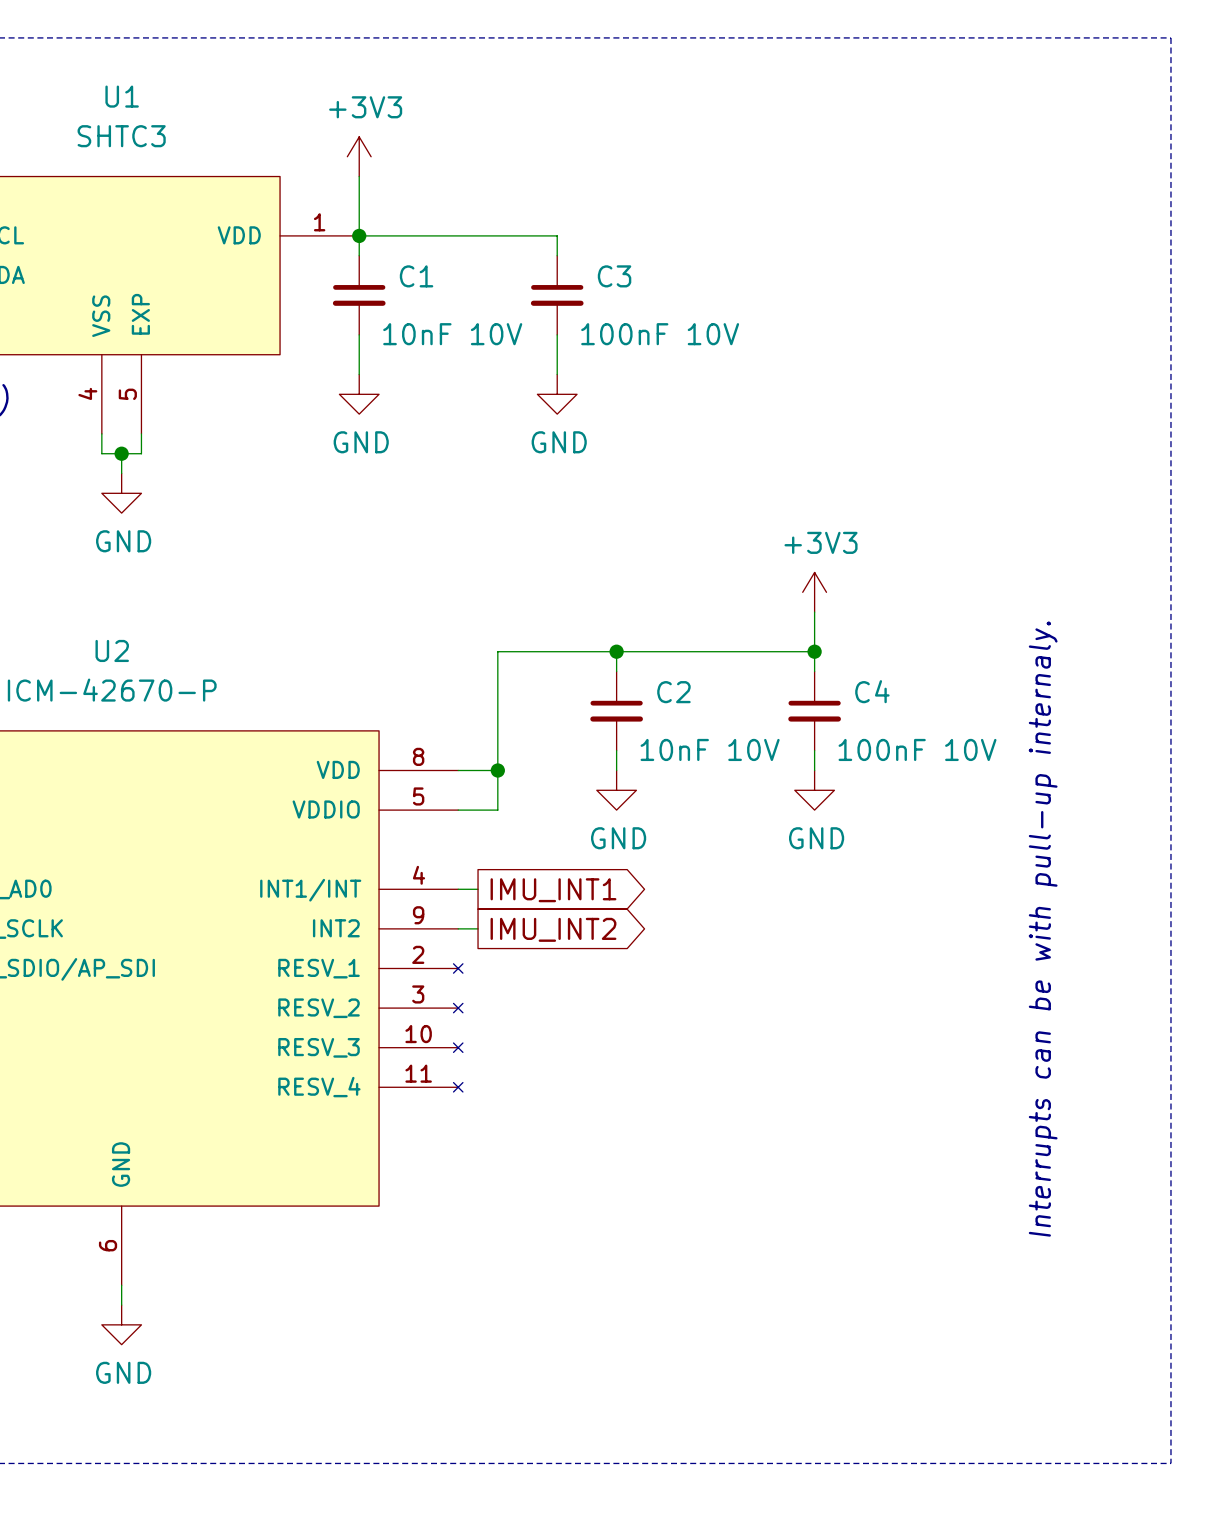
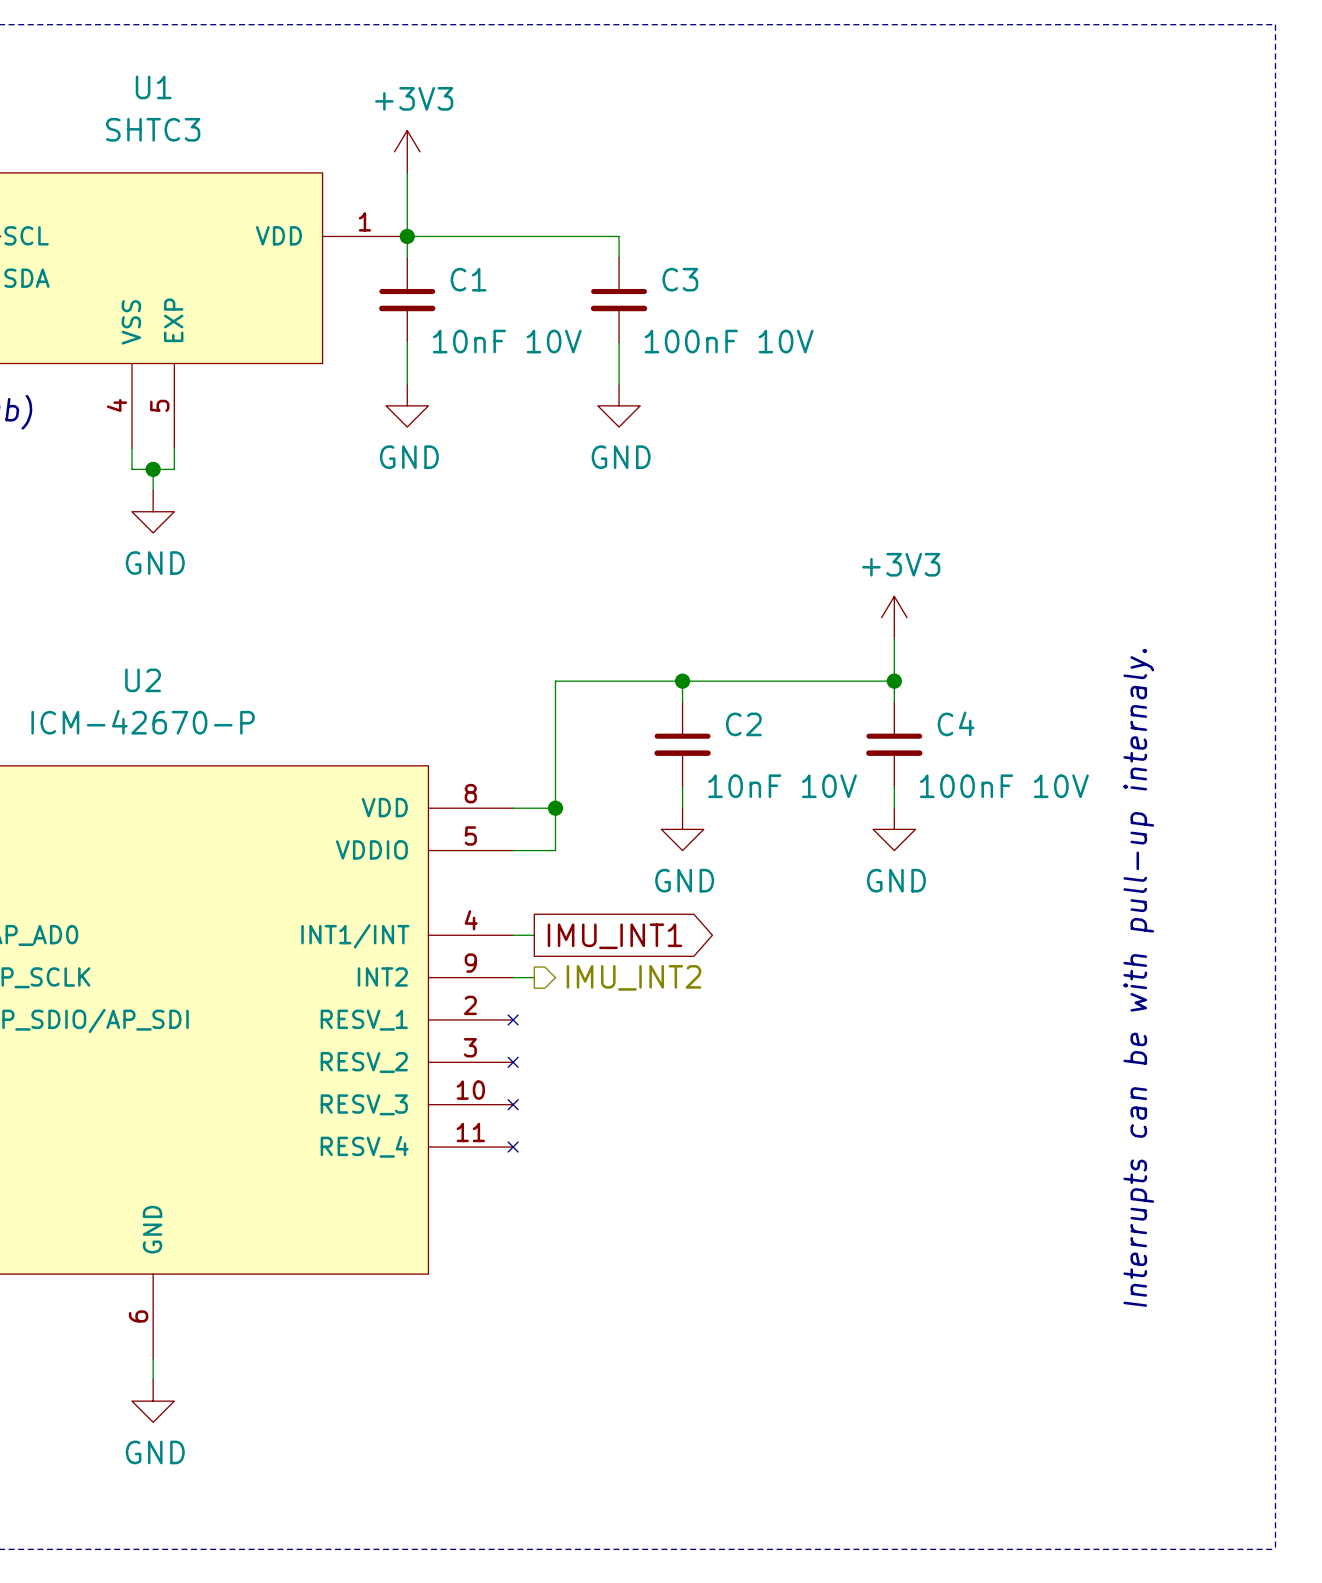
global label: IMU_INT2 (553, 929) -> none
hierarchical label: none -> IMU_INT2 (633, 977)

